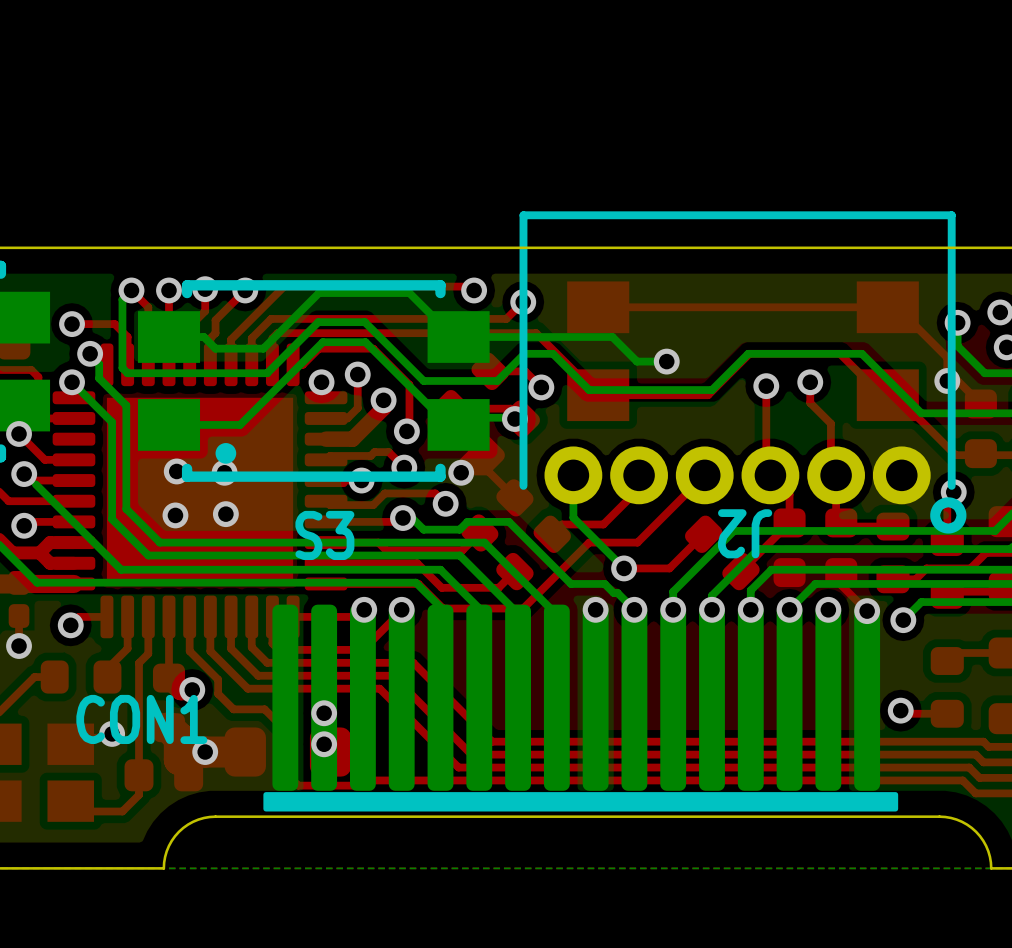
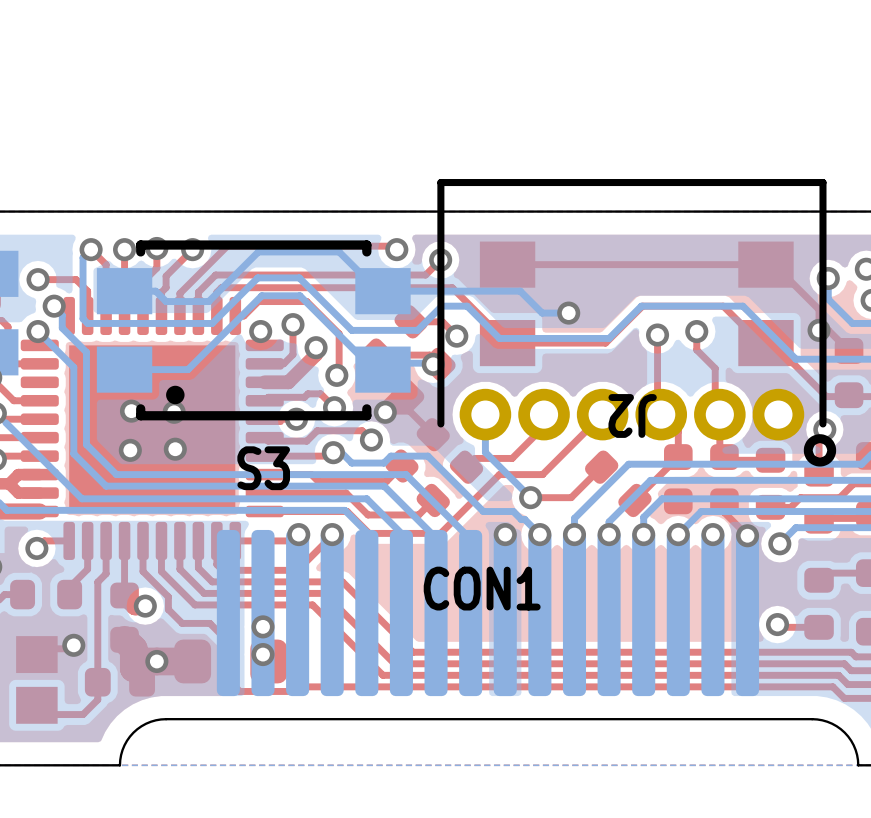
J2 name position: J2 (745, 533) -> J2 (632, 415)
CON1 name position: CON1 (141, 719) -> CON1 (482, 588)
drawing: [263, 792, 899, 812] -> none

